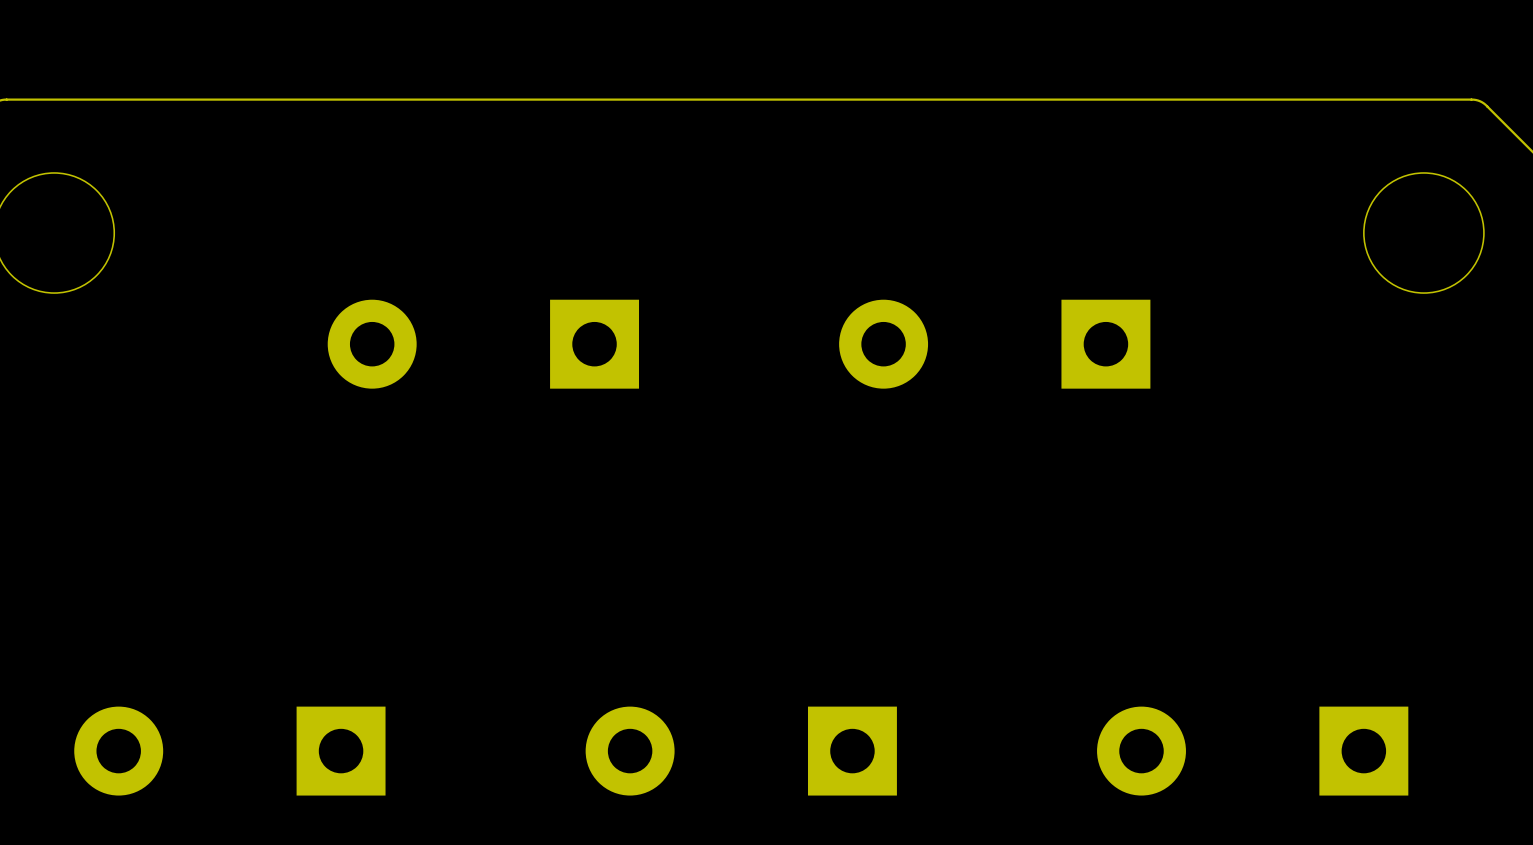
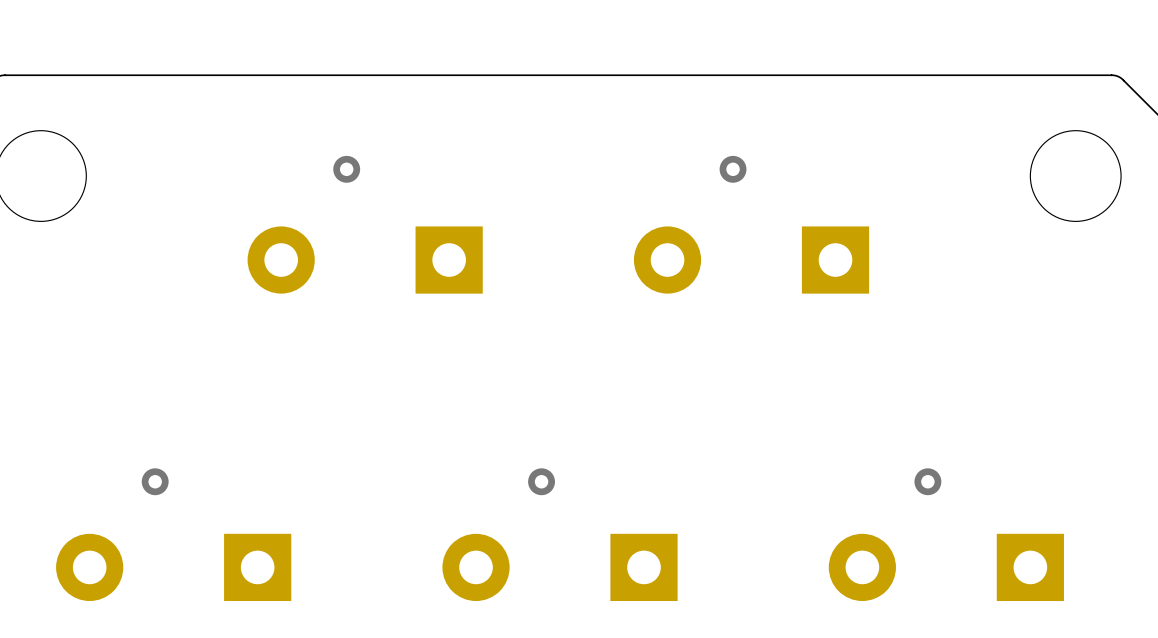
via: none -> (346, 169)
via: none -> (733, 169)
via: none -> (155, 481)
via: none -> (541, 481)
via: none -> (927, 481)

